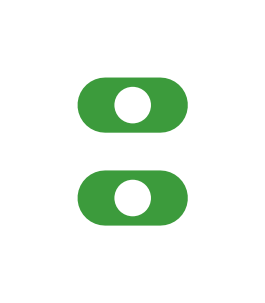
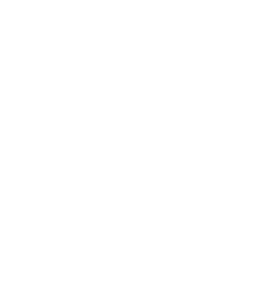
part: (132, 151) -> none

